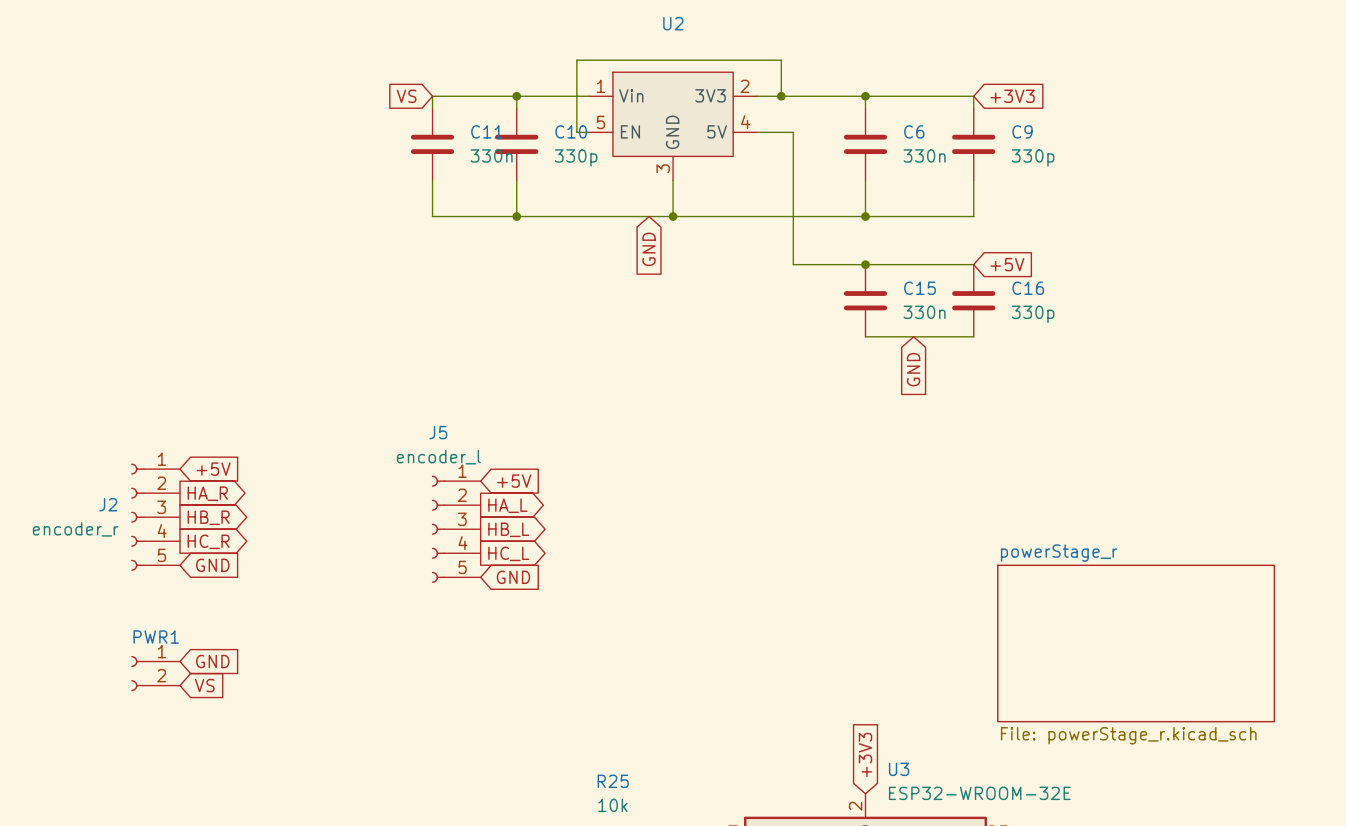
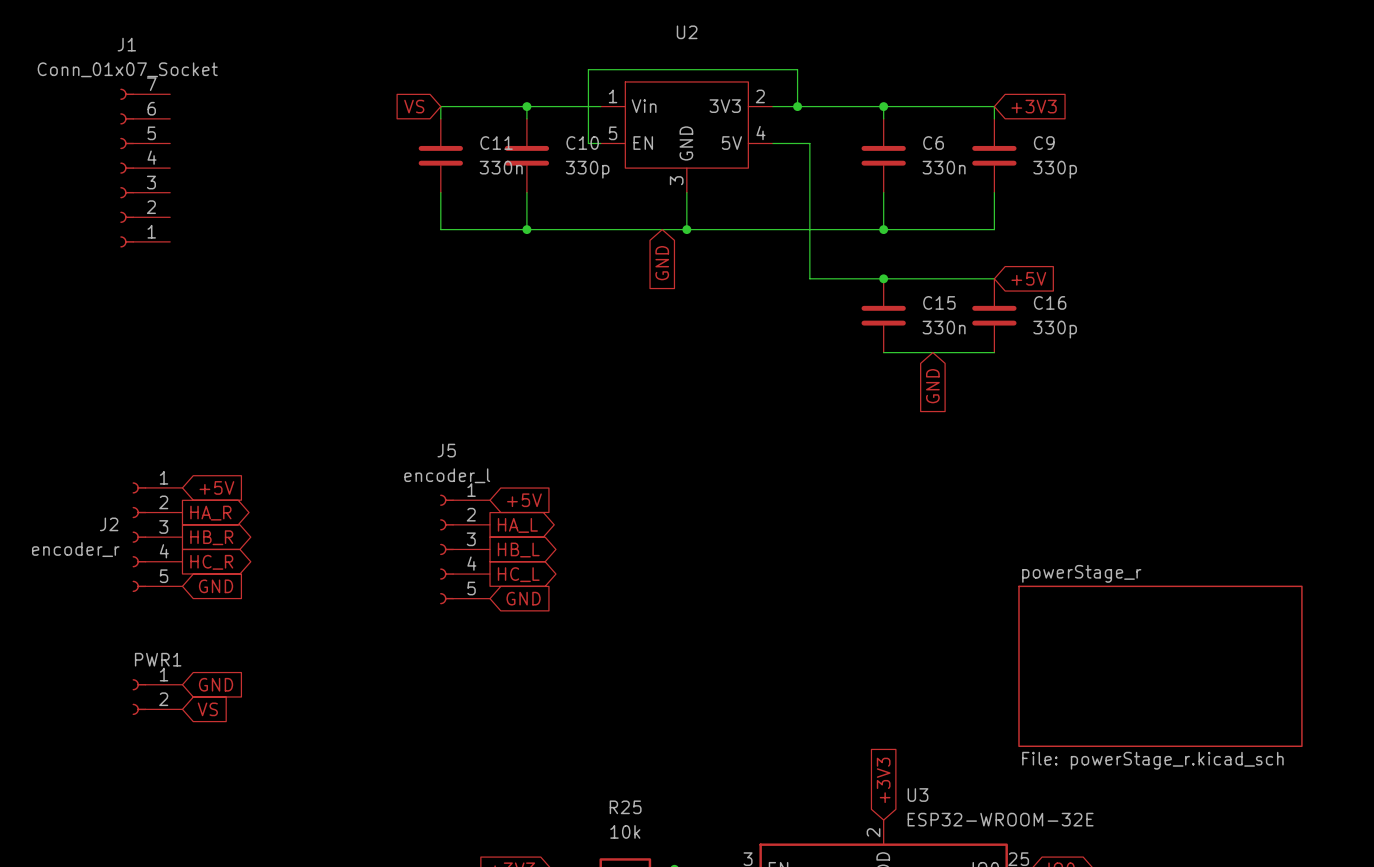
J1: none -> Conn_01x07_Socket (145, 168)

